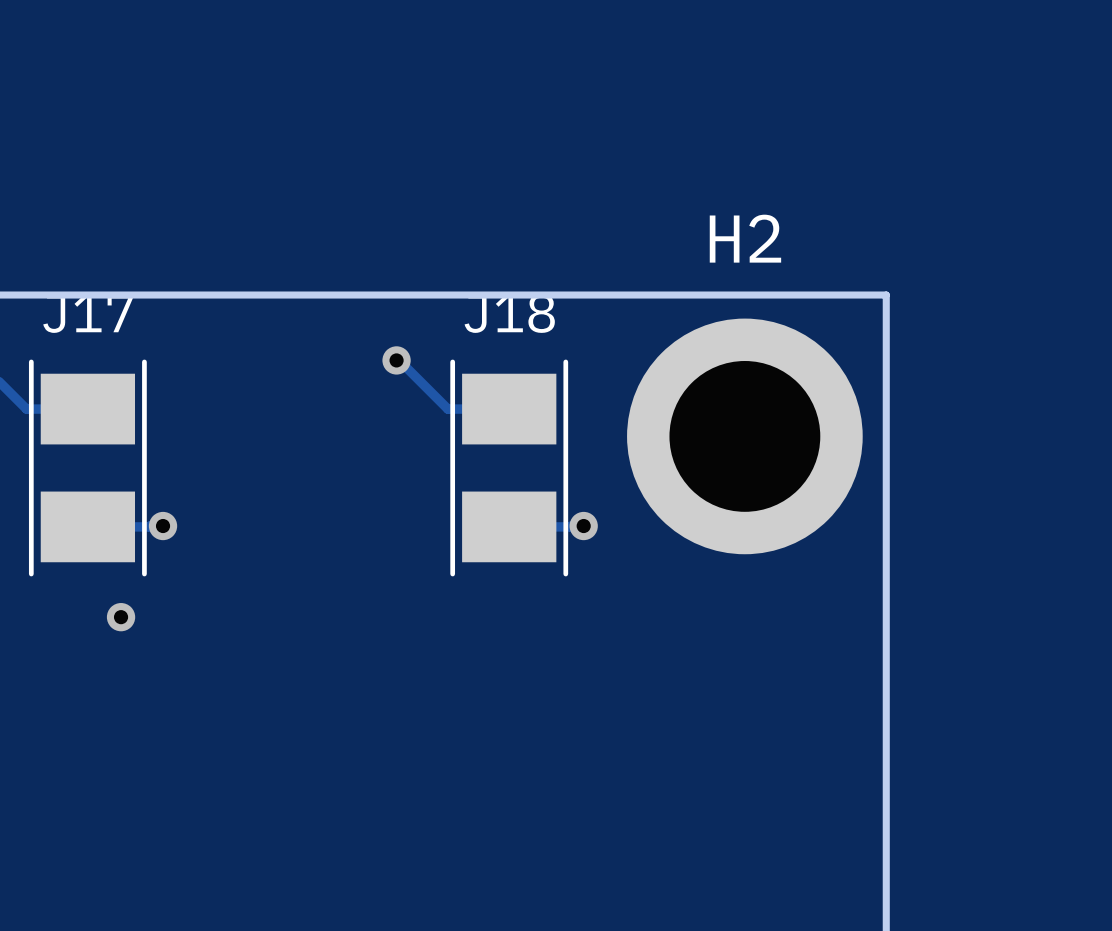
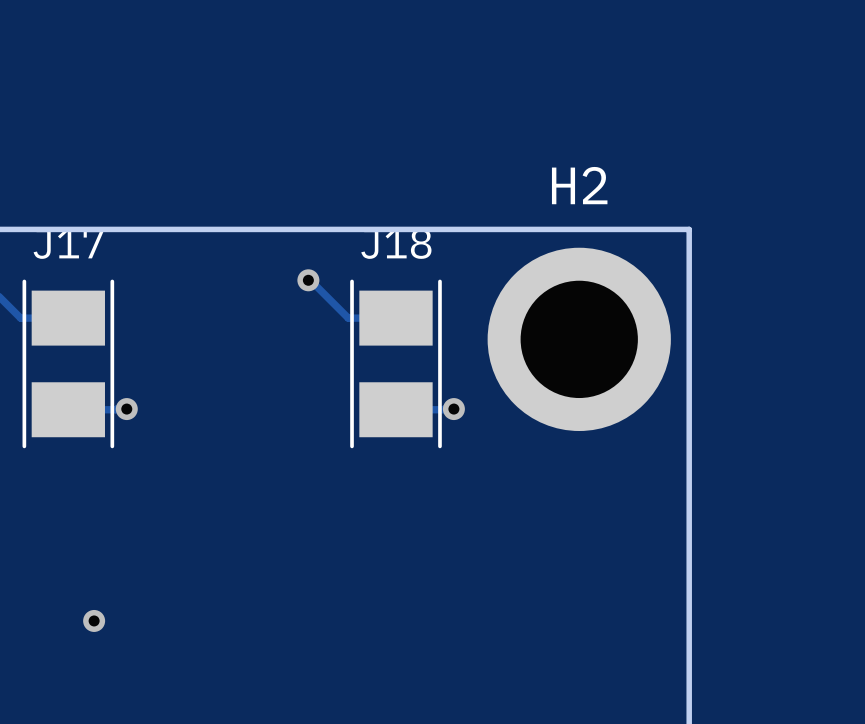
via position: (121, 617) -> (94, 620)

